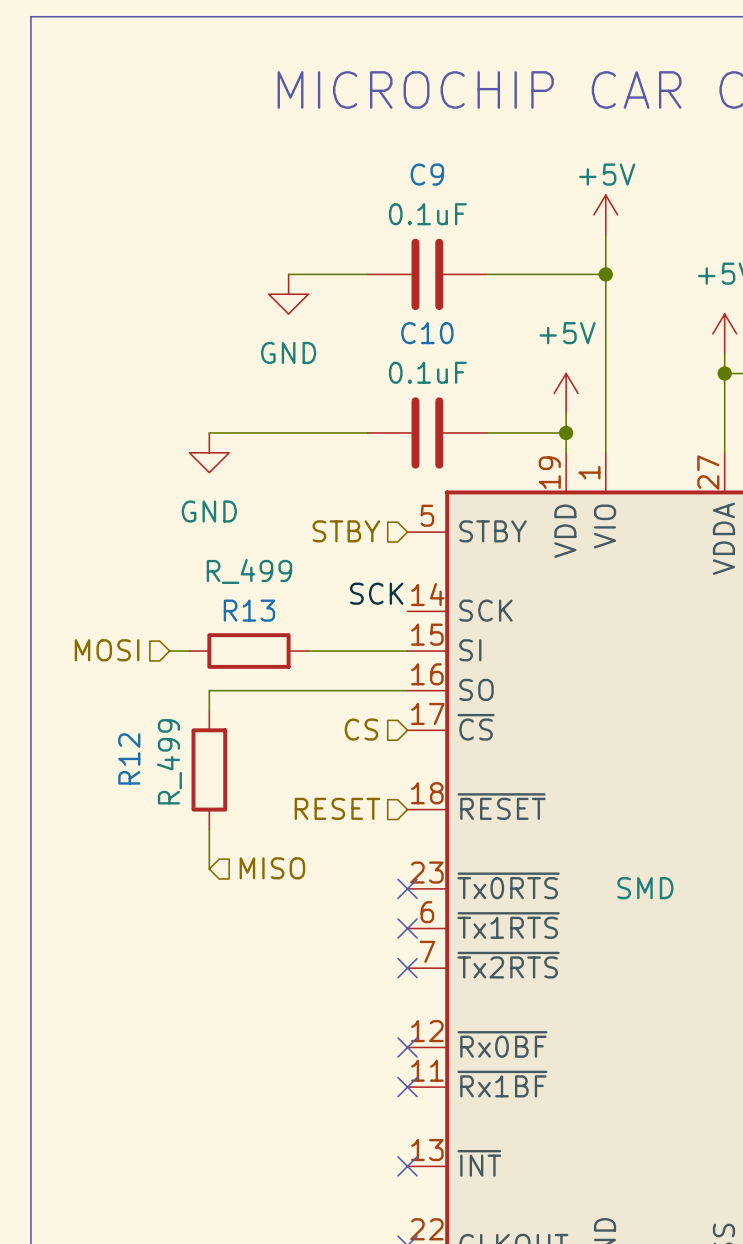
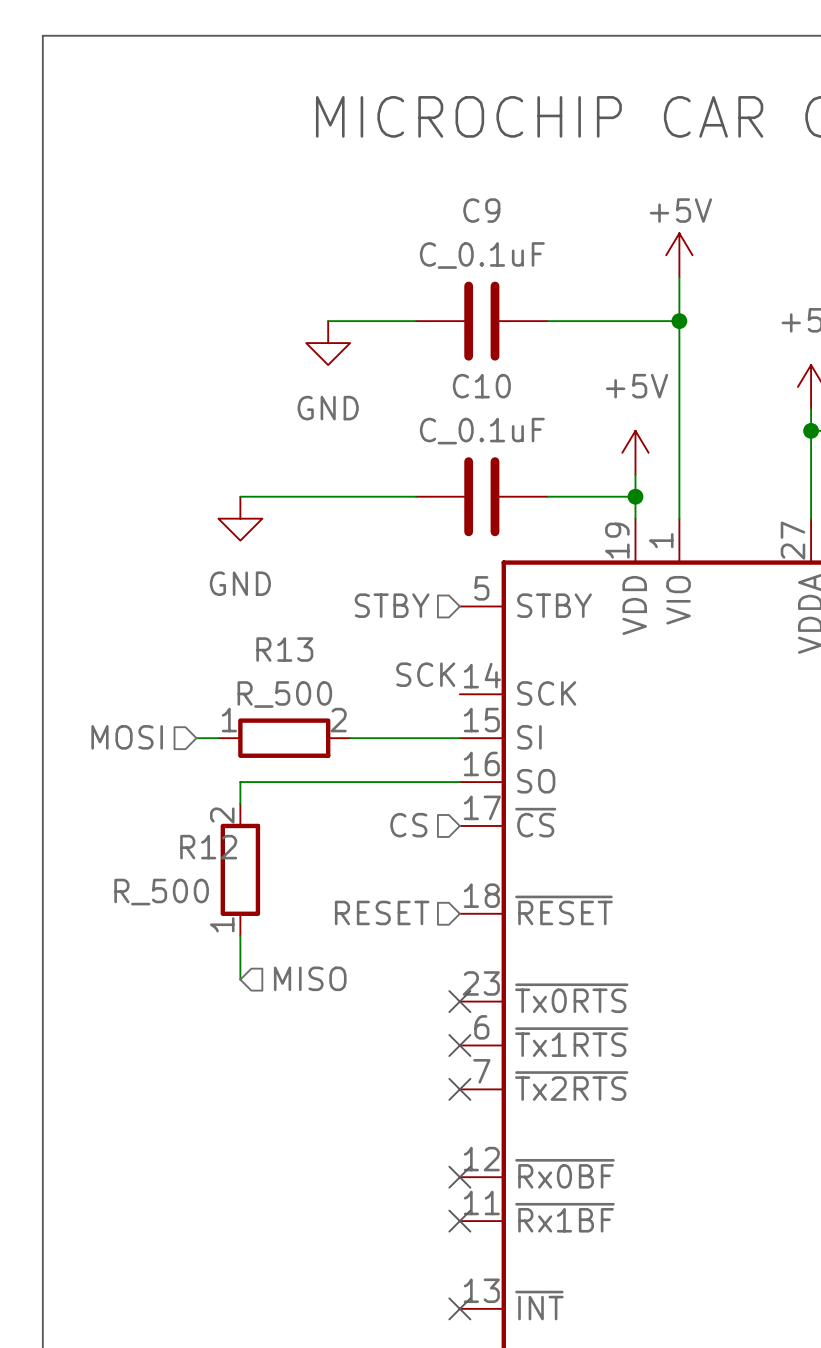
C9 value: 0.1uF (427, 214) -> C_0.1uF (482, 255)
C10 value: 0.1uF (427, 372) -> C_0.1uF (482, 431)
R13 value: R_499 (249, 571) -> R_500 (284, 694)
R13 name position: R13 (249, 610) -> R13 (284, 649)
R13 pin number: none -> 1 (229, 720)
R13 pin number: none -> 2 (338, 720)
R12 pin number: none -> 2 (222, 815)
R12 name rotation: 0° (129, 758) -> 90° clockwise (208, 847)
R12 value: R_499 (169, 761) -> R_500 (161, 892)
R12 pin number: none -> 1 (222, 924)
part text: SMD (645, 888) -> none

